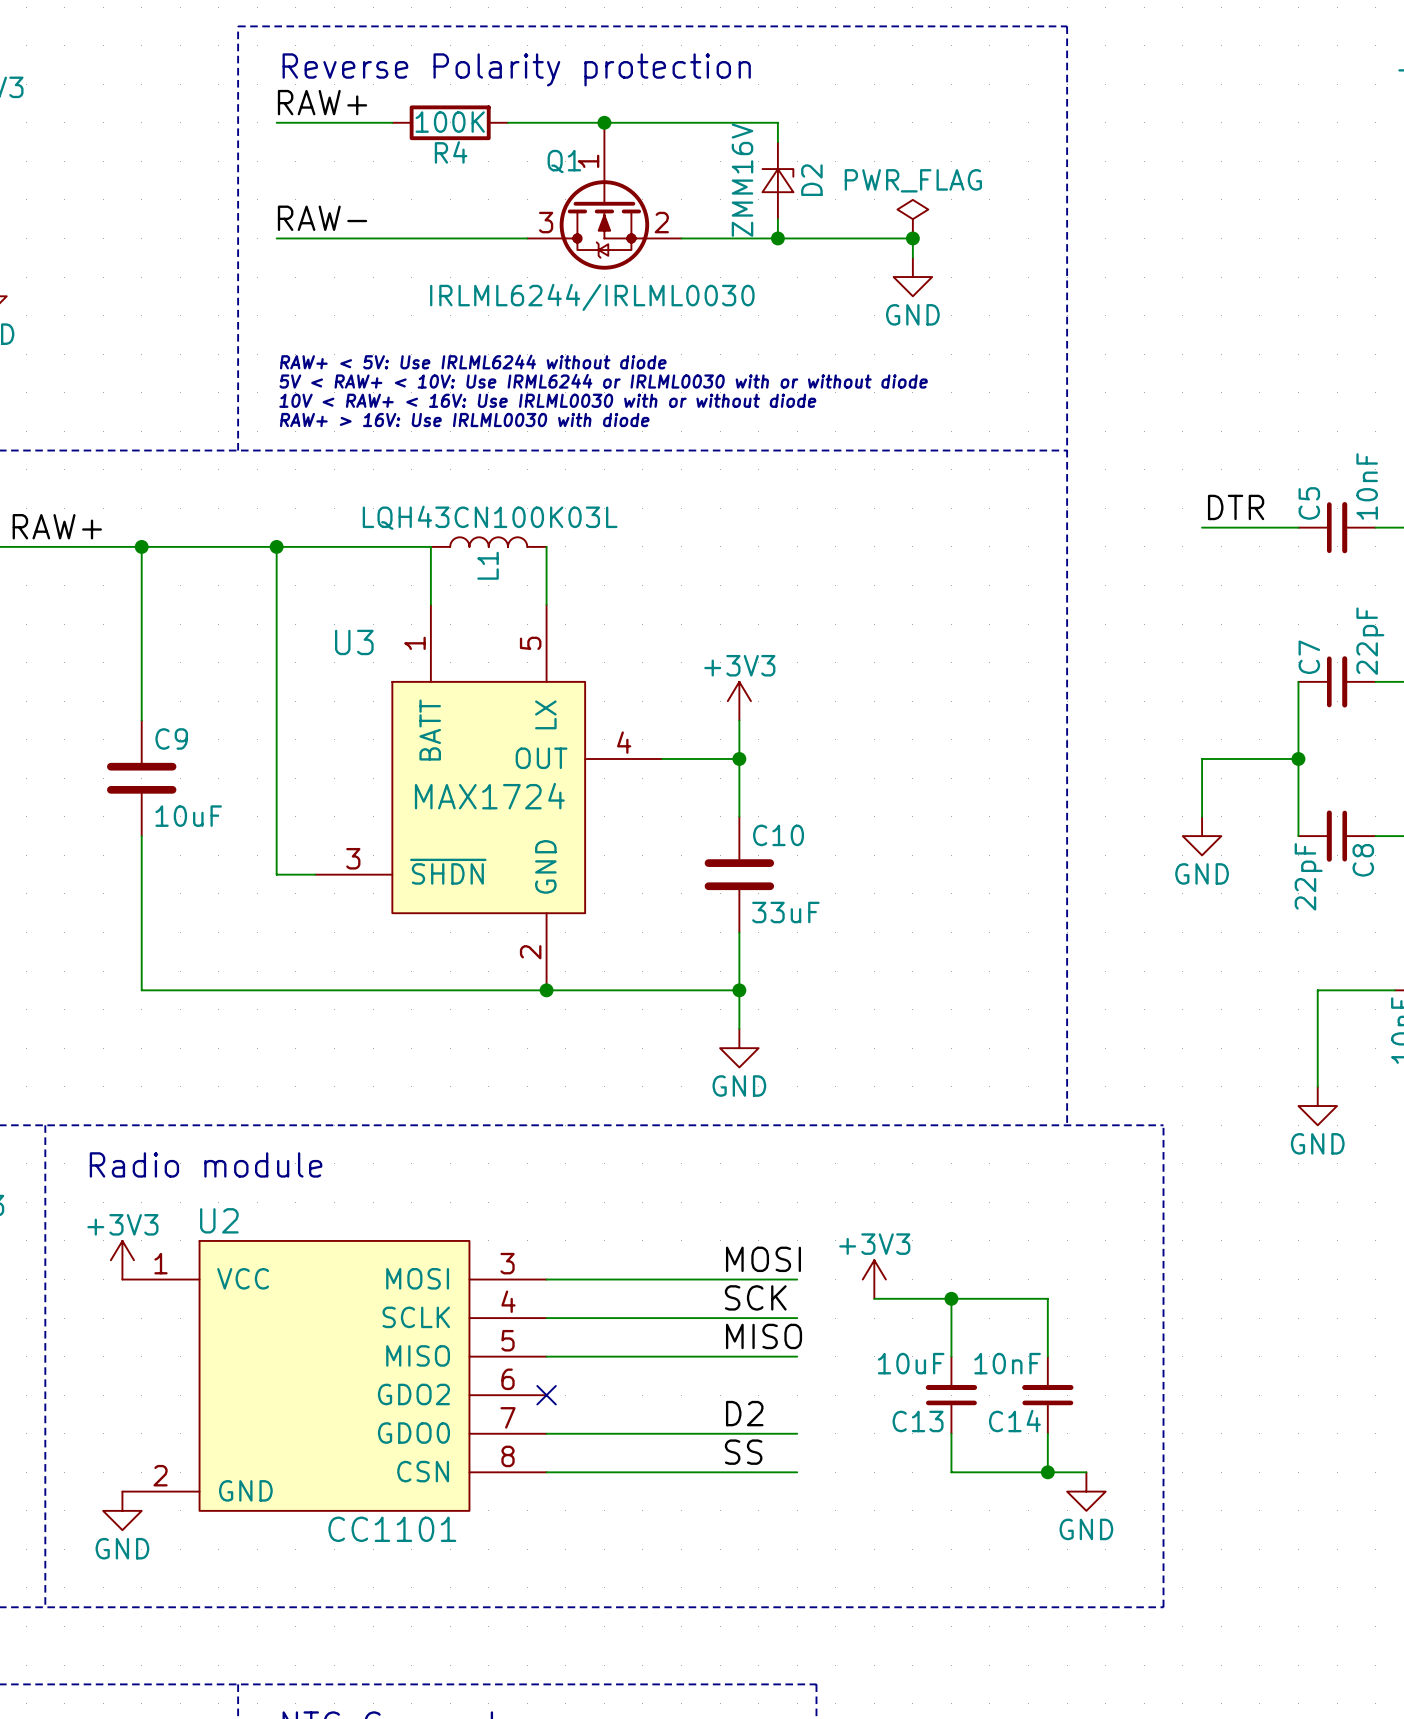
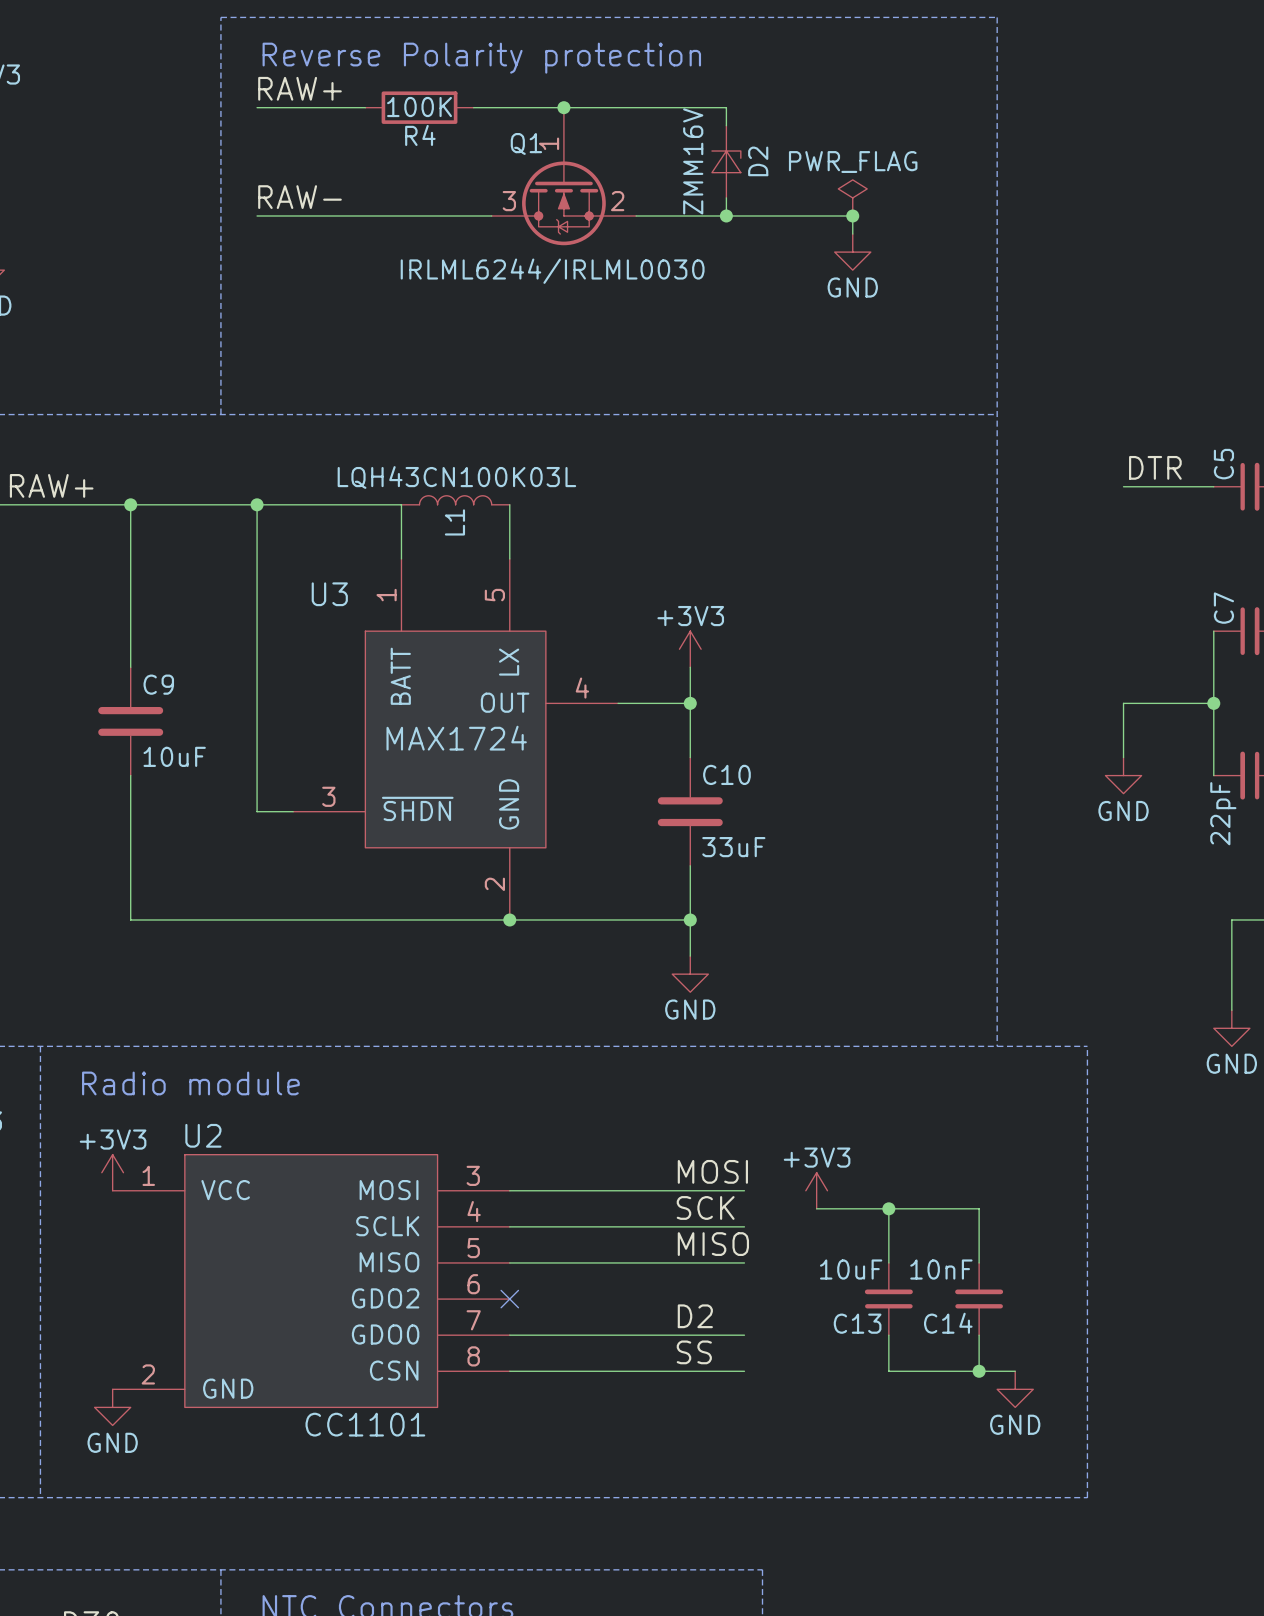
text: RAW+ < 5V: Use IRLML6244 without diode (473, 361) -> none
text: 5V < RAW+ < 10V: Use IRML6244 or IRLML0030 with or without diode (603, 381) -> none
text: 10V < RAW+ < 16V: Use IRLML0030 with or without diode (547, 400) -> none
text: RAW+ > 16V: Use IRLML0030 with diode (464, 420) -> none

